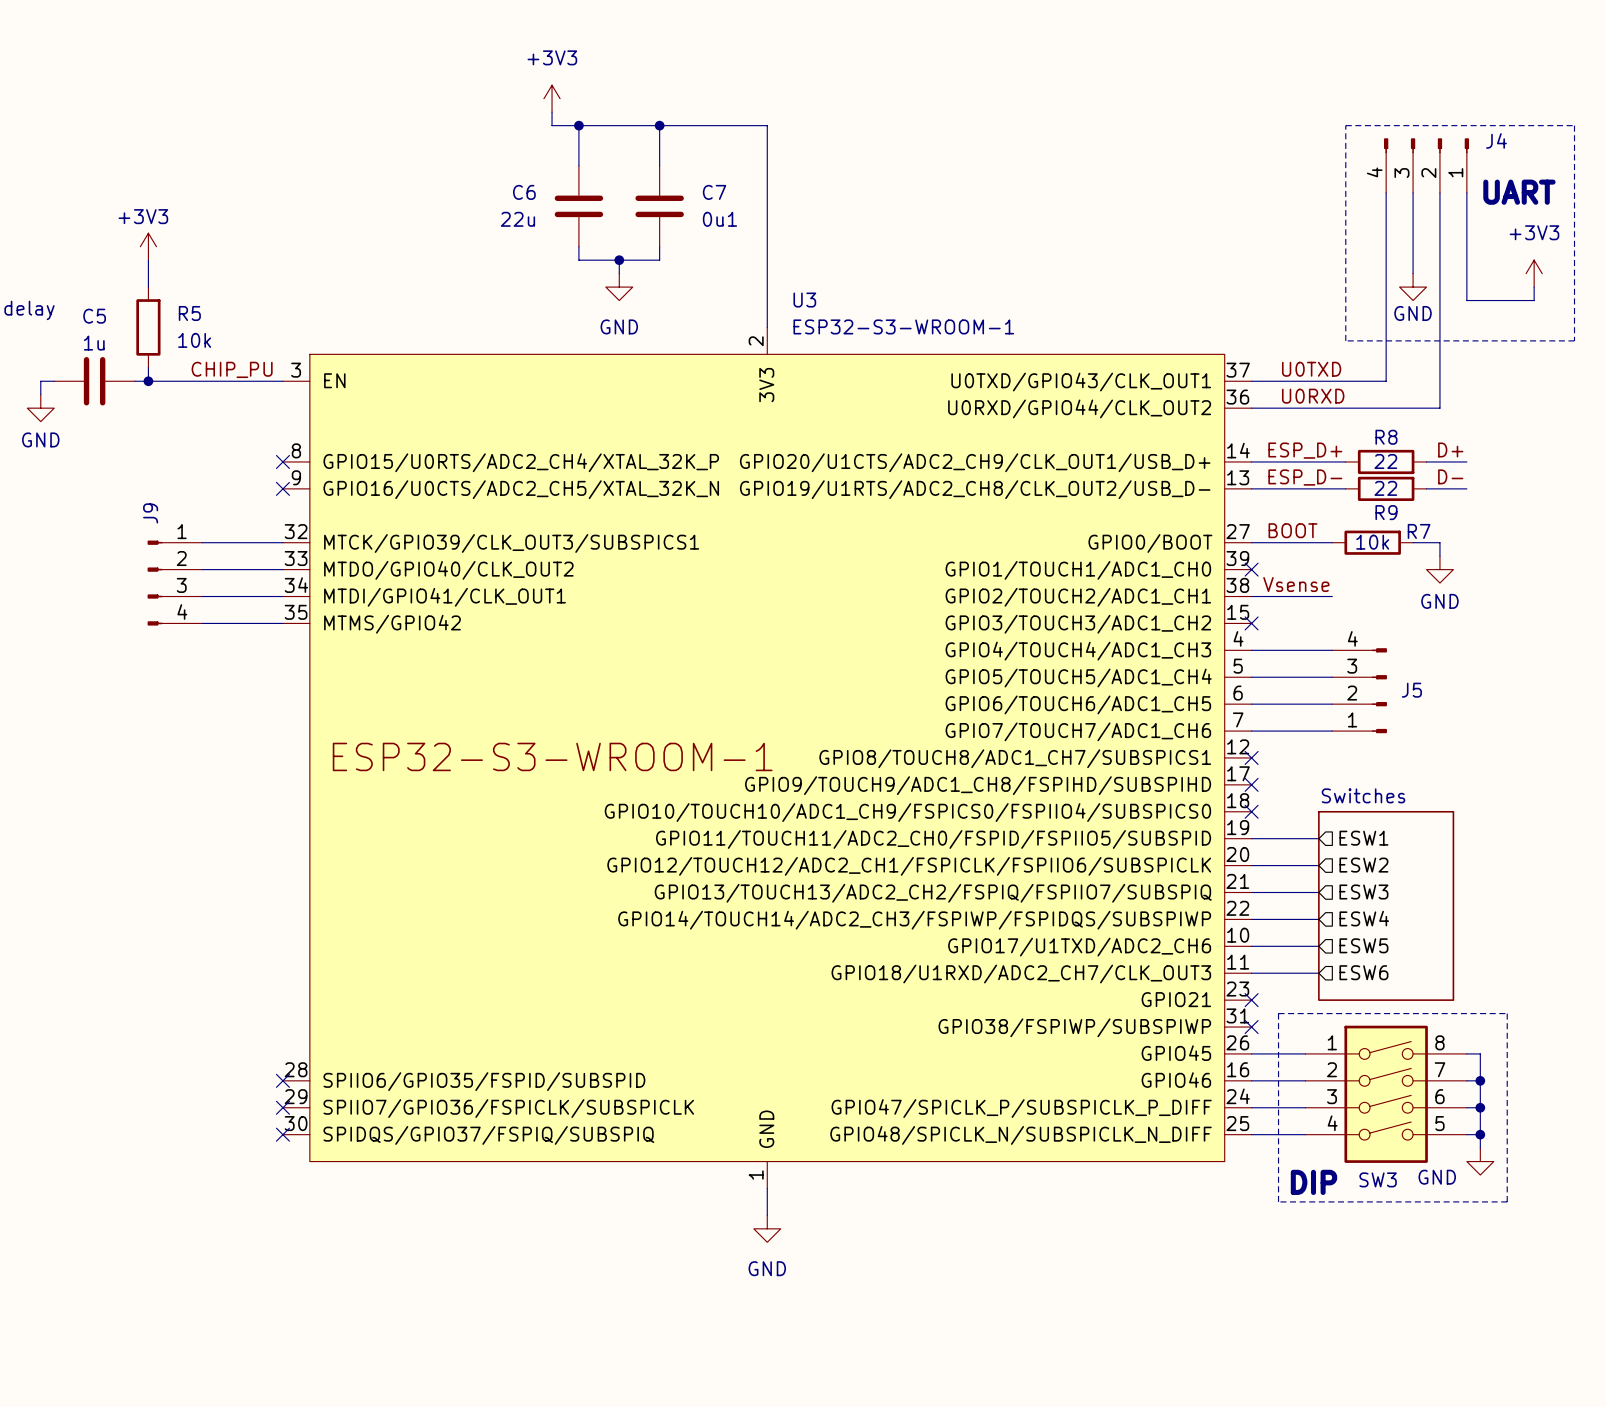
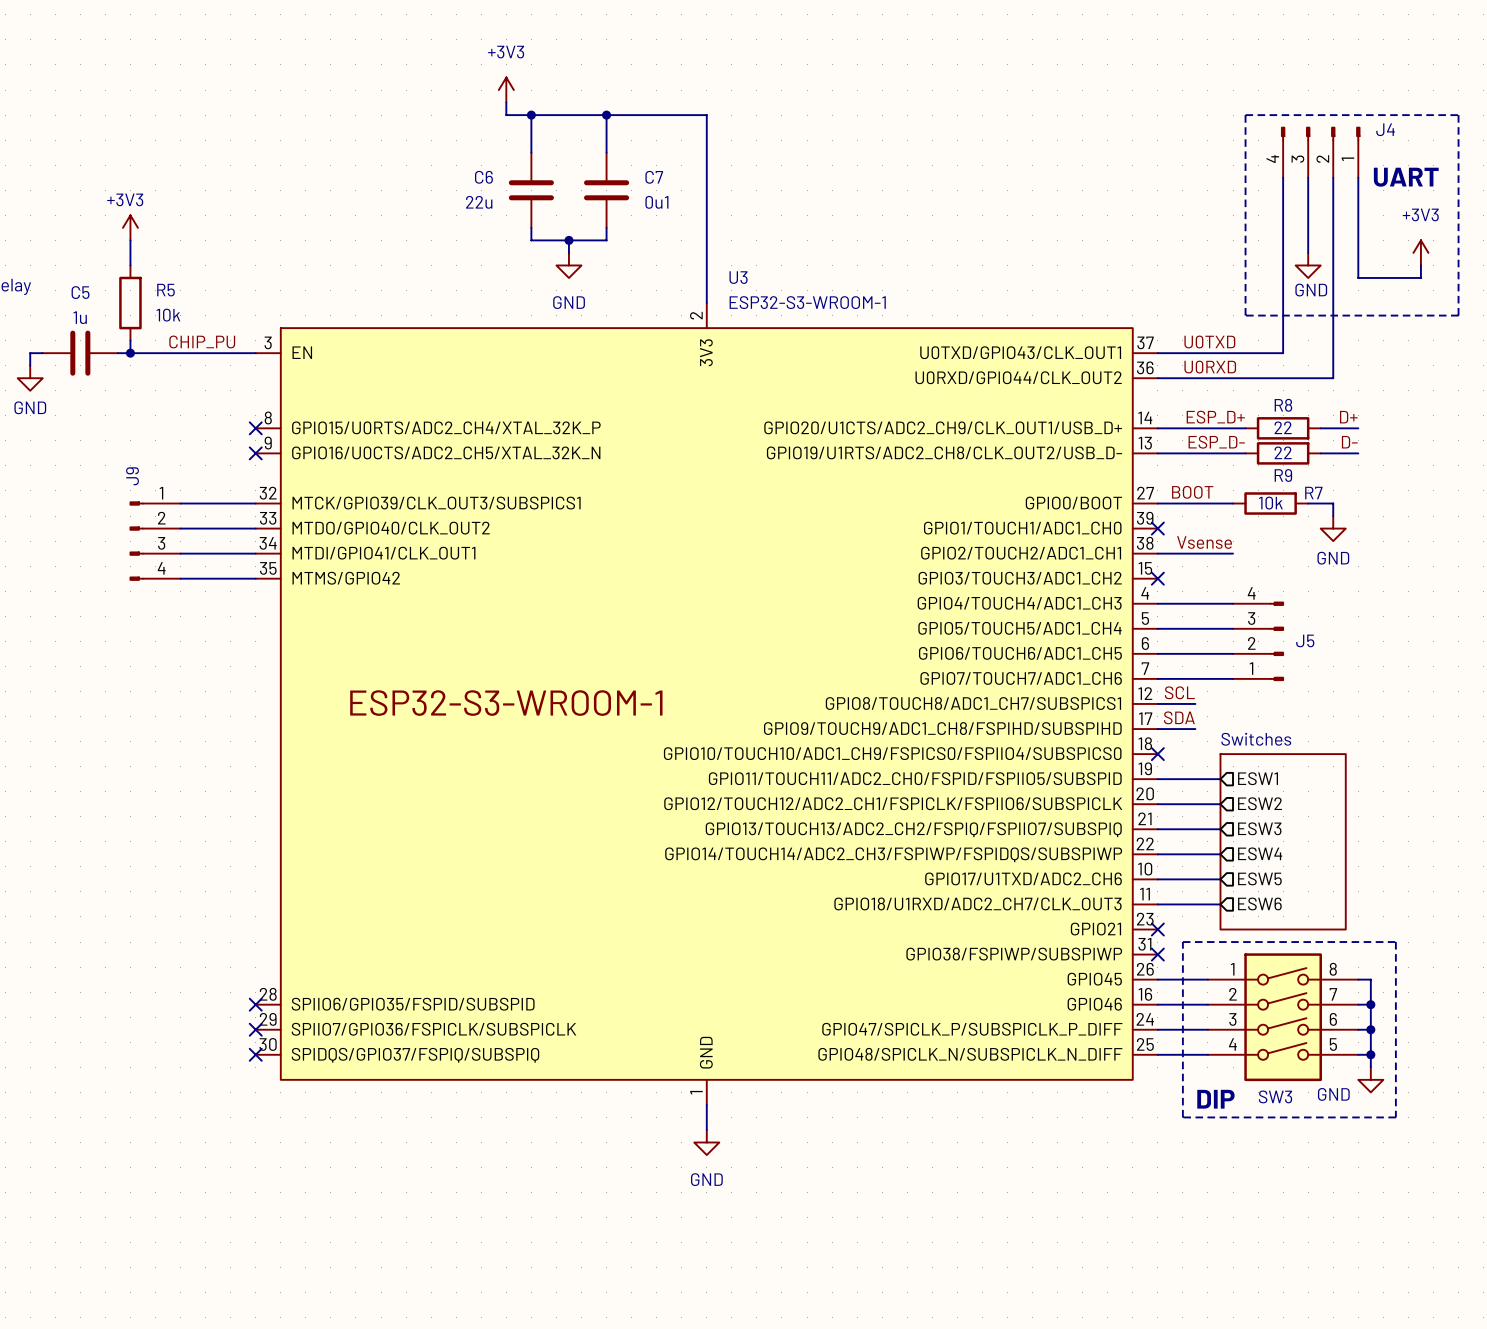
label: none -> SCL (1179, 692)
wire: none -> (1157, 703) (1195, 703)
no-connect mark: (1251, 757) -> none
label: none -> SDA (1179, 717)
wire: none -> (1157, 729) (1195, 729)
no-connect mark: (1251, 784) -> none

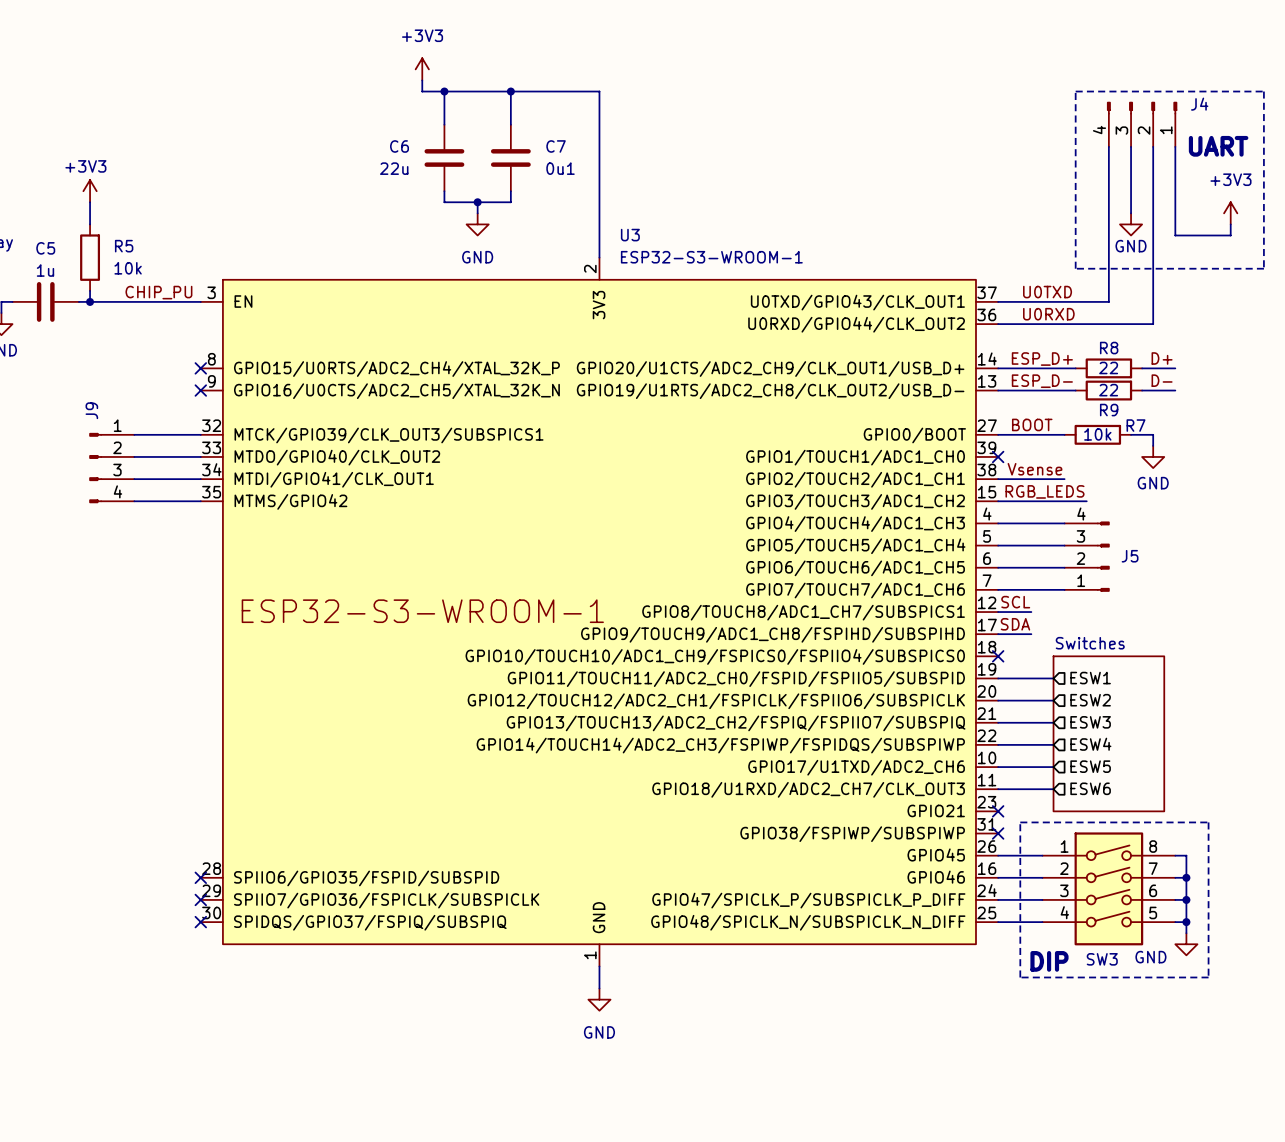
label: none -> RGB_LEDS (1045, 491)
wire: none -> (998, 501) (1086, 501)
no-connect mark: (1157, 578) -> none

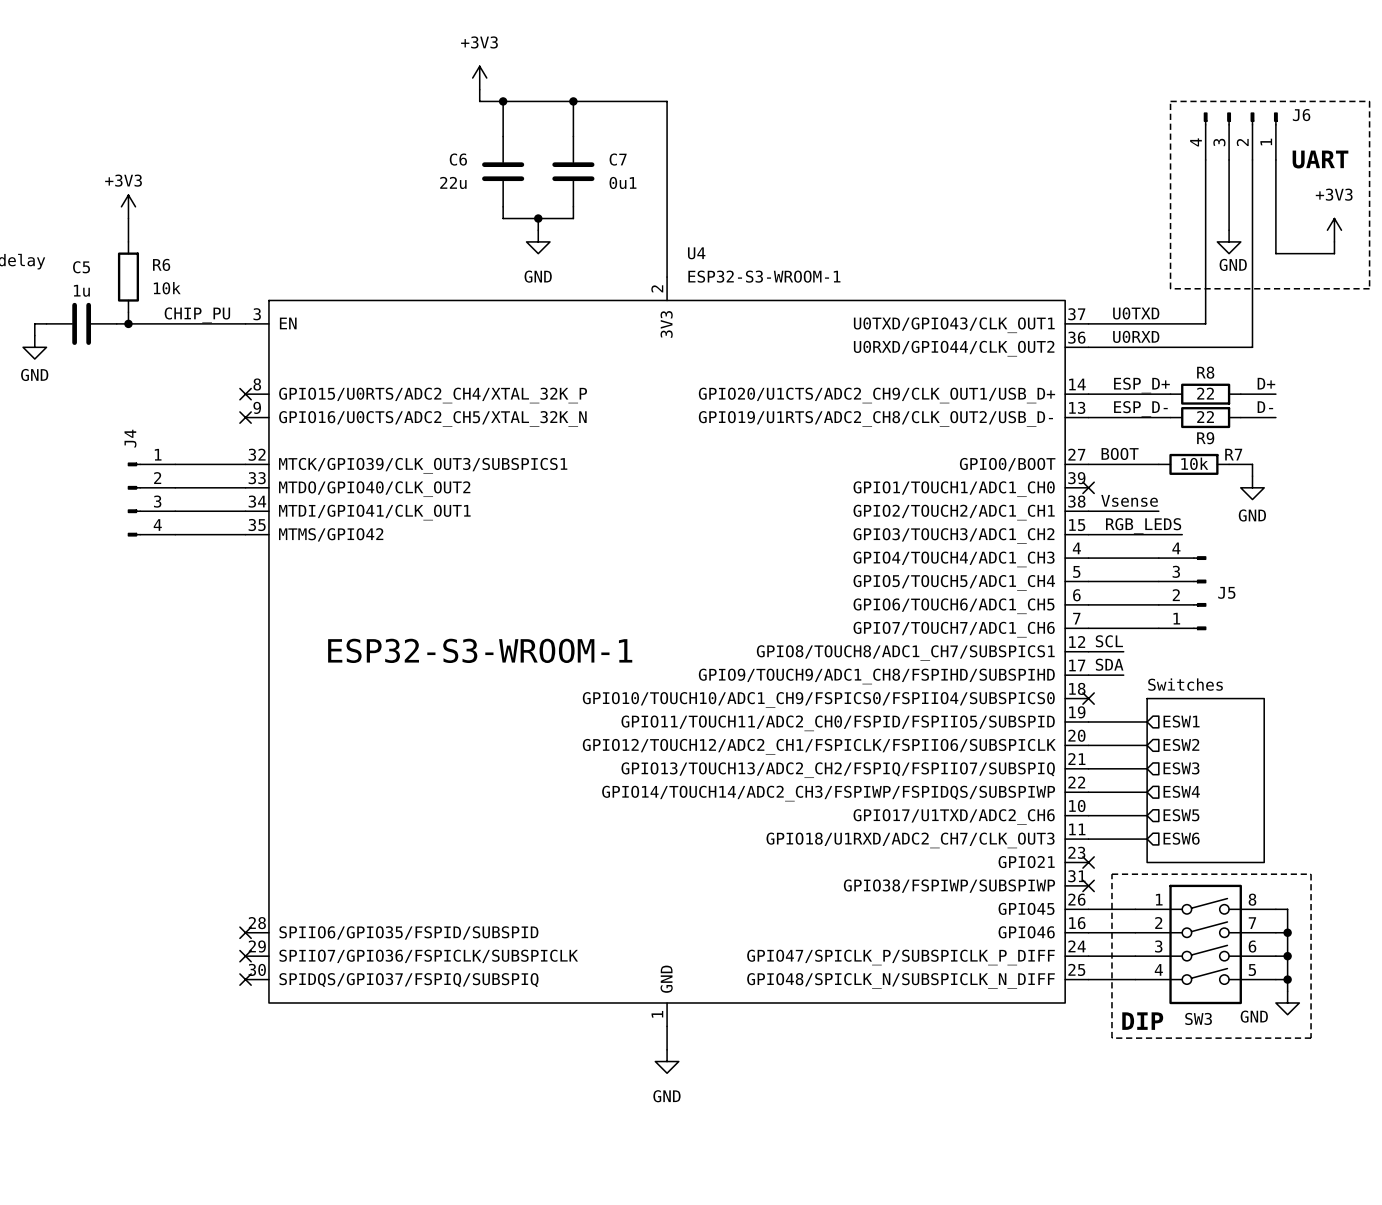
J4 name: J4 (1199, 104) -> J6 (1301, 115)
U3 name: U3 (630, 235) -> U4 (696, 253)
R5 name: R5 (124, 246) -> R6 (161, 264)
J9 name: J9 (91, 410) -> J4 (130, 438)

